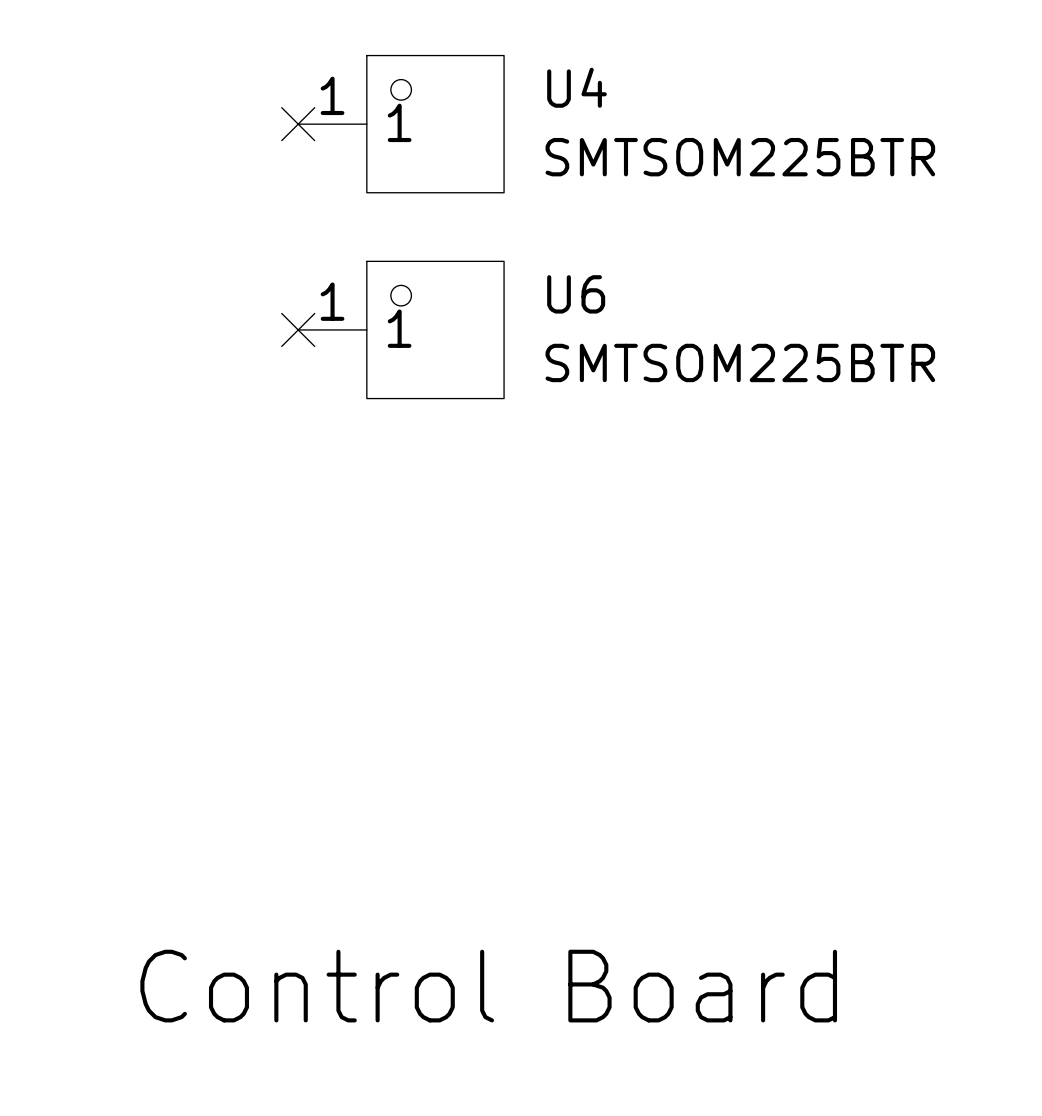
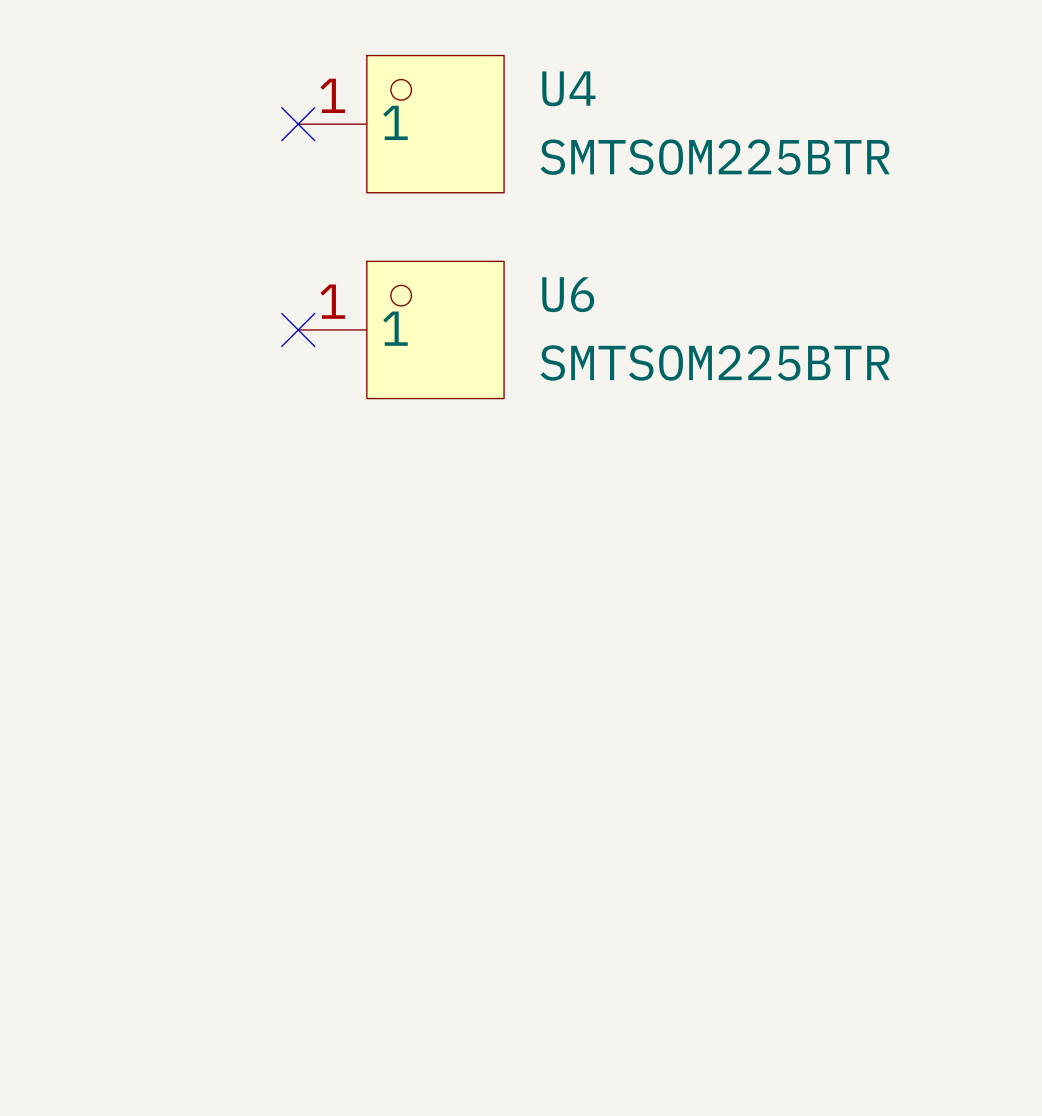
text: Control Board (488, 986) -> none

